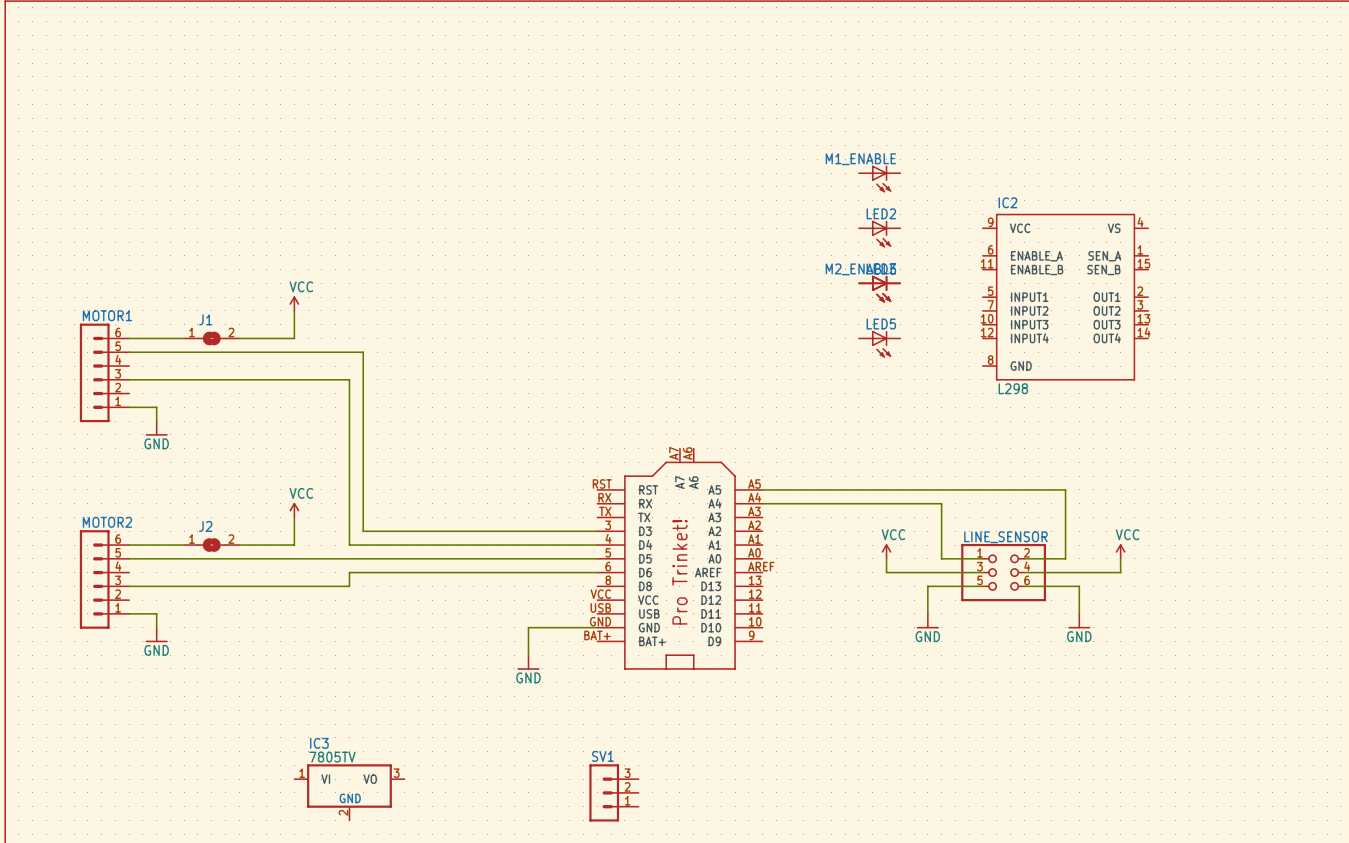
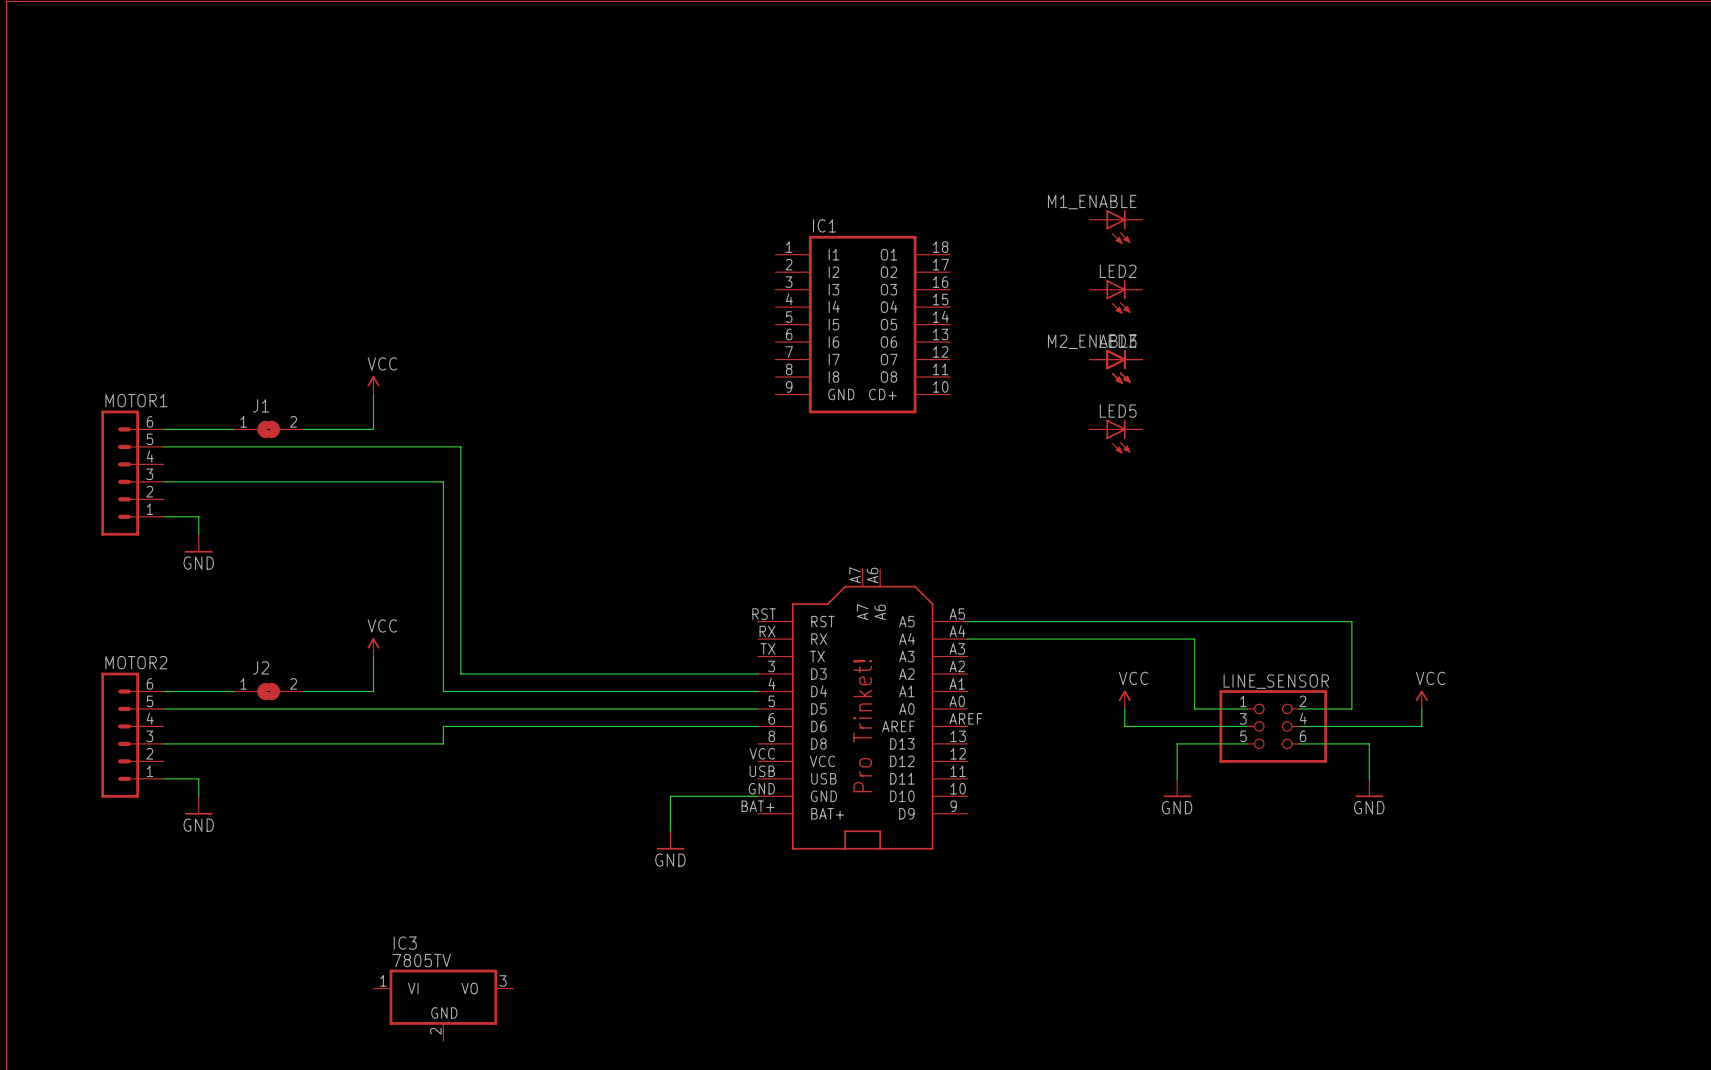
IC1: none -> (862, 324)
IC2: L298 (1065, 297) -> none
SV1: (614, 792) -> none

